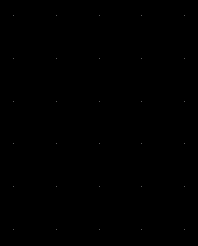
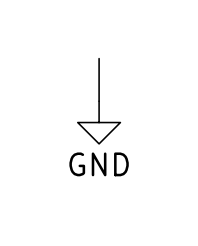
wire: none -> (99, 58) (99, 101)
power symbol: none -> GND (99, 122)

